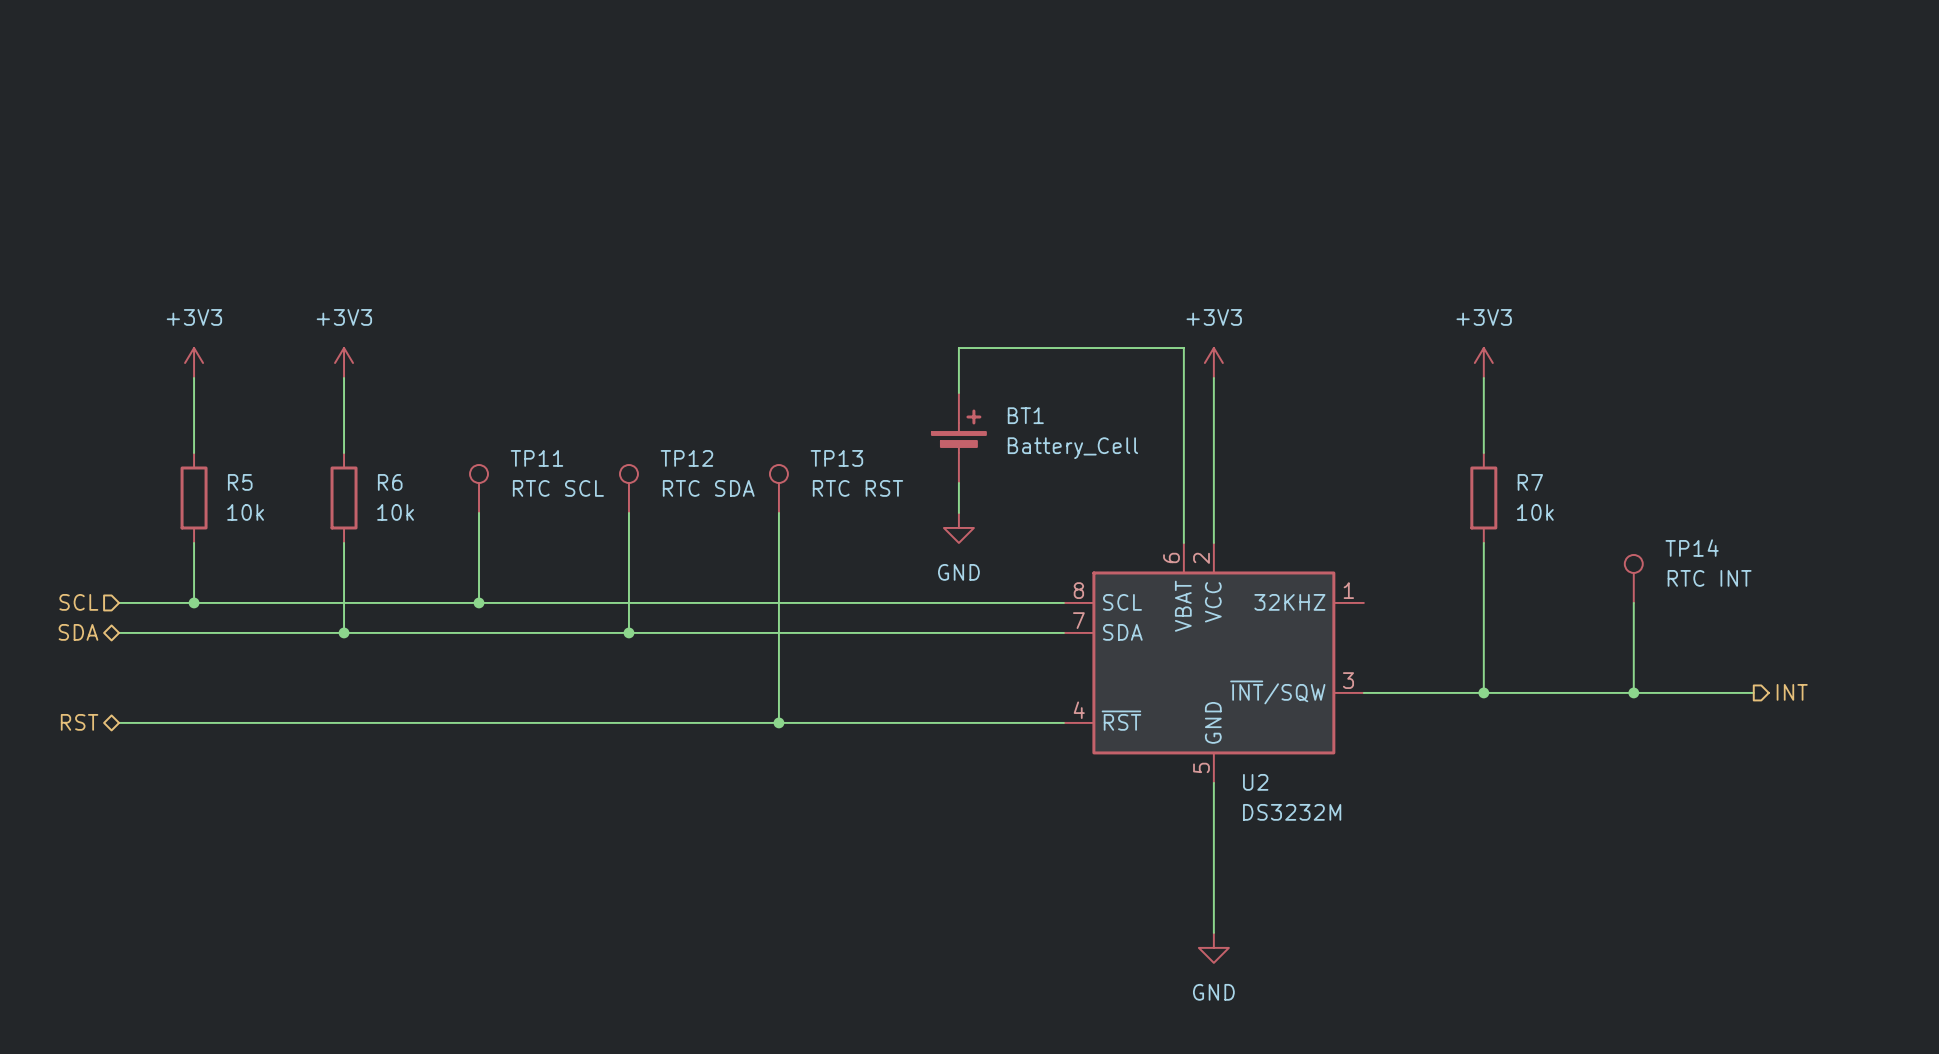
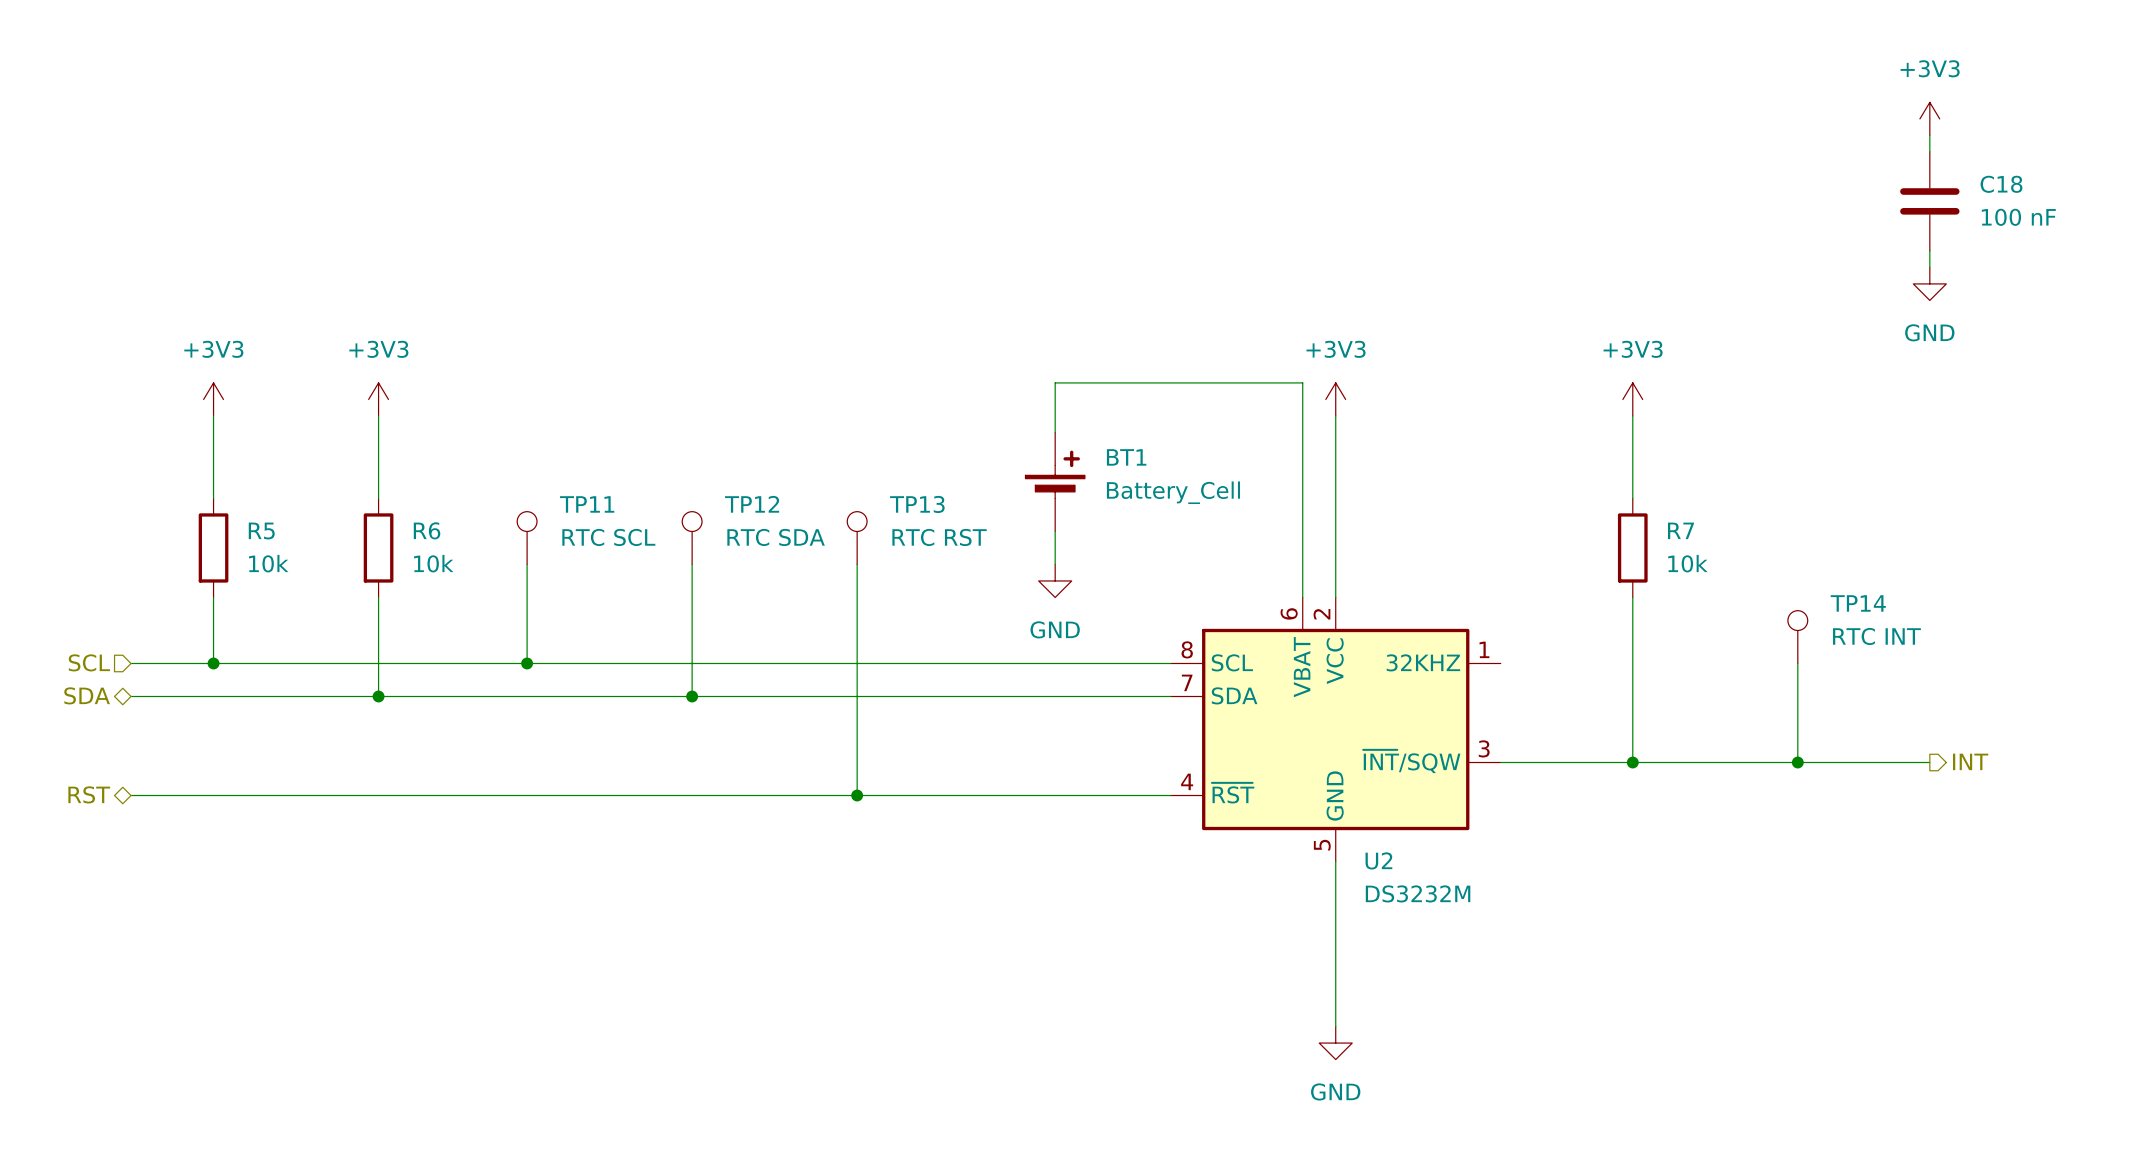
power symbol: none -> +3V3 (1929, 118)
wire: none -> (1929, 135) (1929, 151)
C18: none -> 100 nF (1929, 201)
wire: none -> (1929, 250) (1929, 267)
power symbol: none -> GND (1929, 283)

